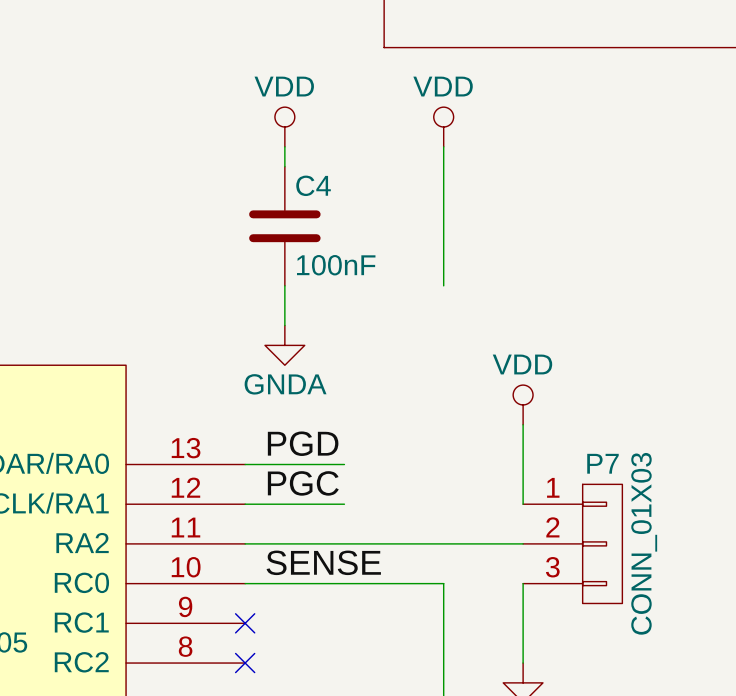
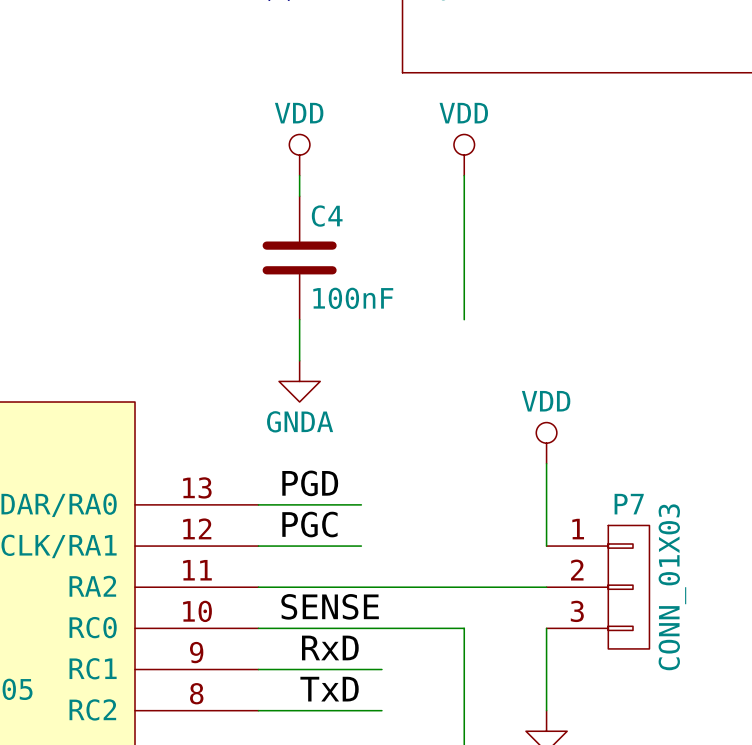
label: none -> RxD (330, 647)
wire: none -> (258, 669) (381, 669)
no-connect mark: (245, 623) -> none
label: none -> TxD (329, 689)
wire: none -> (258, 710) (381, 710)
no-connect mark: (245, 663) -> none

